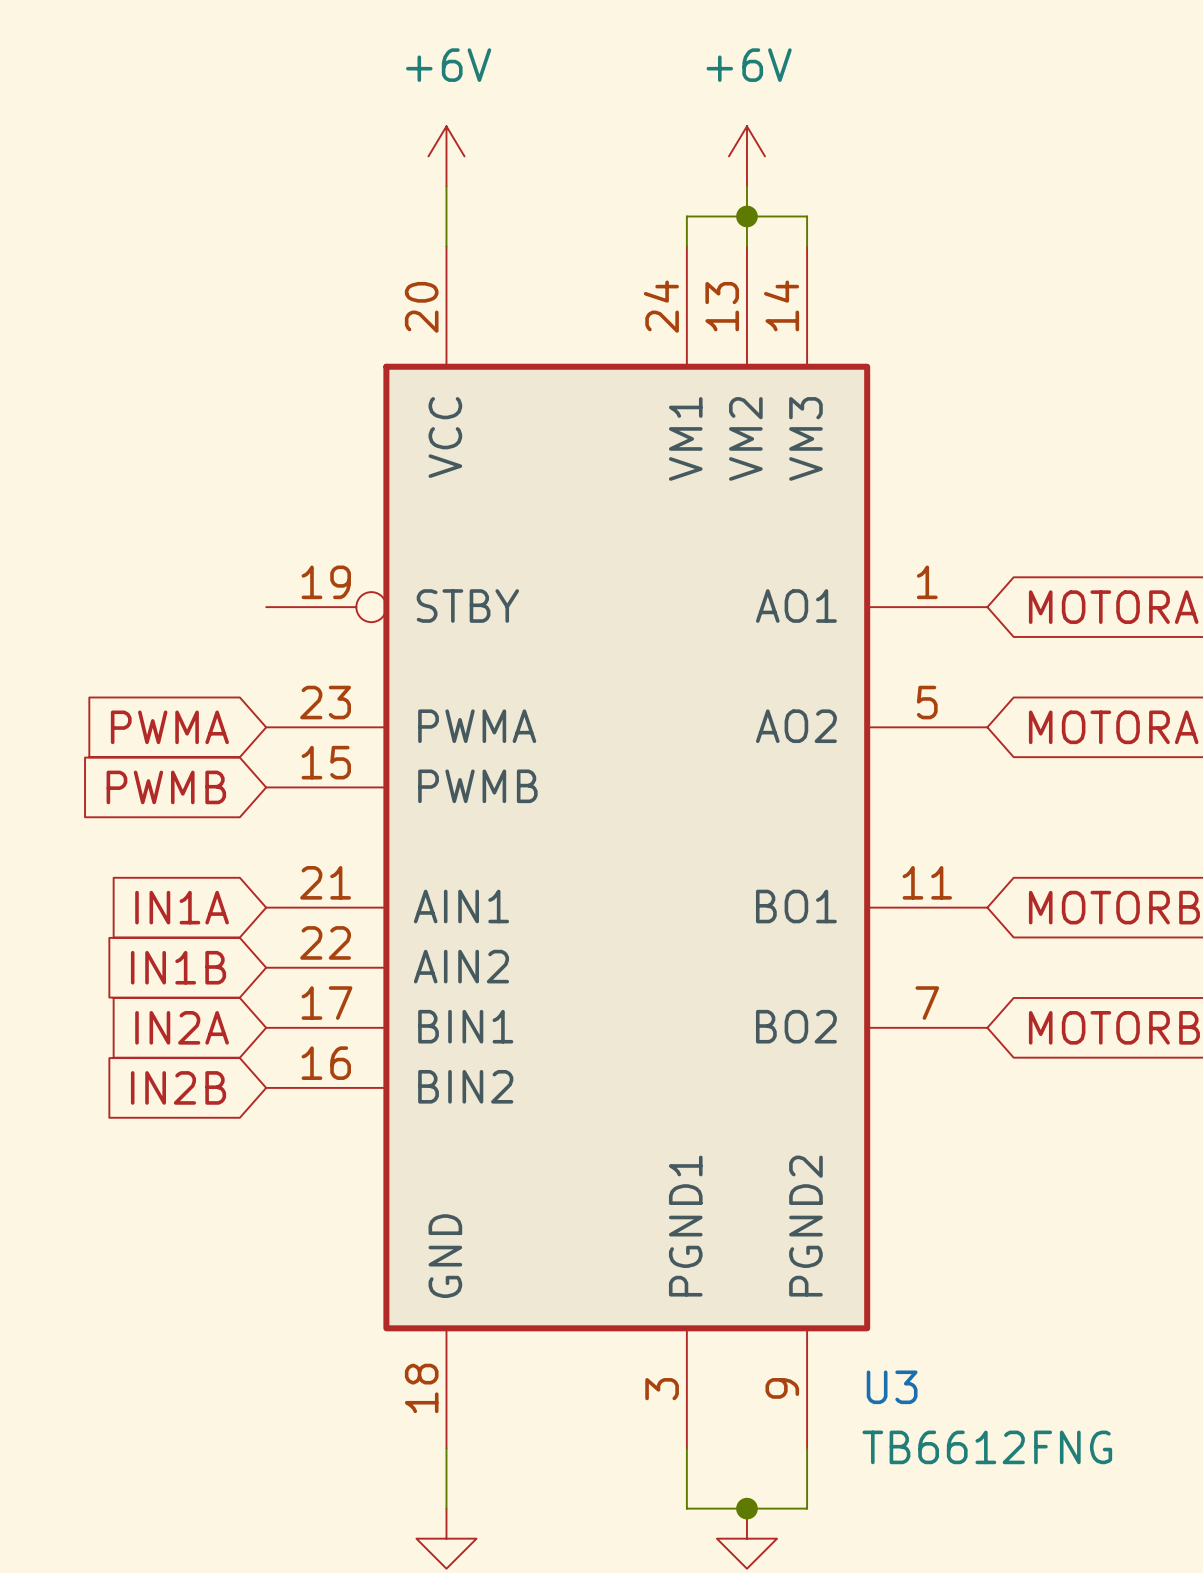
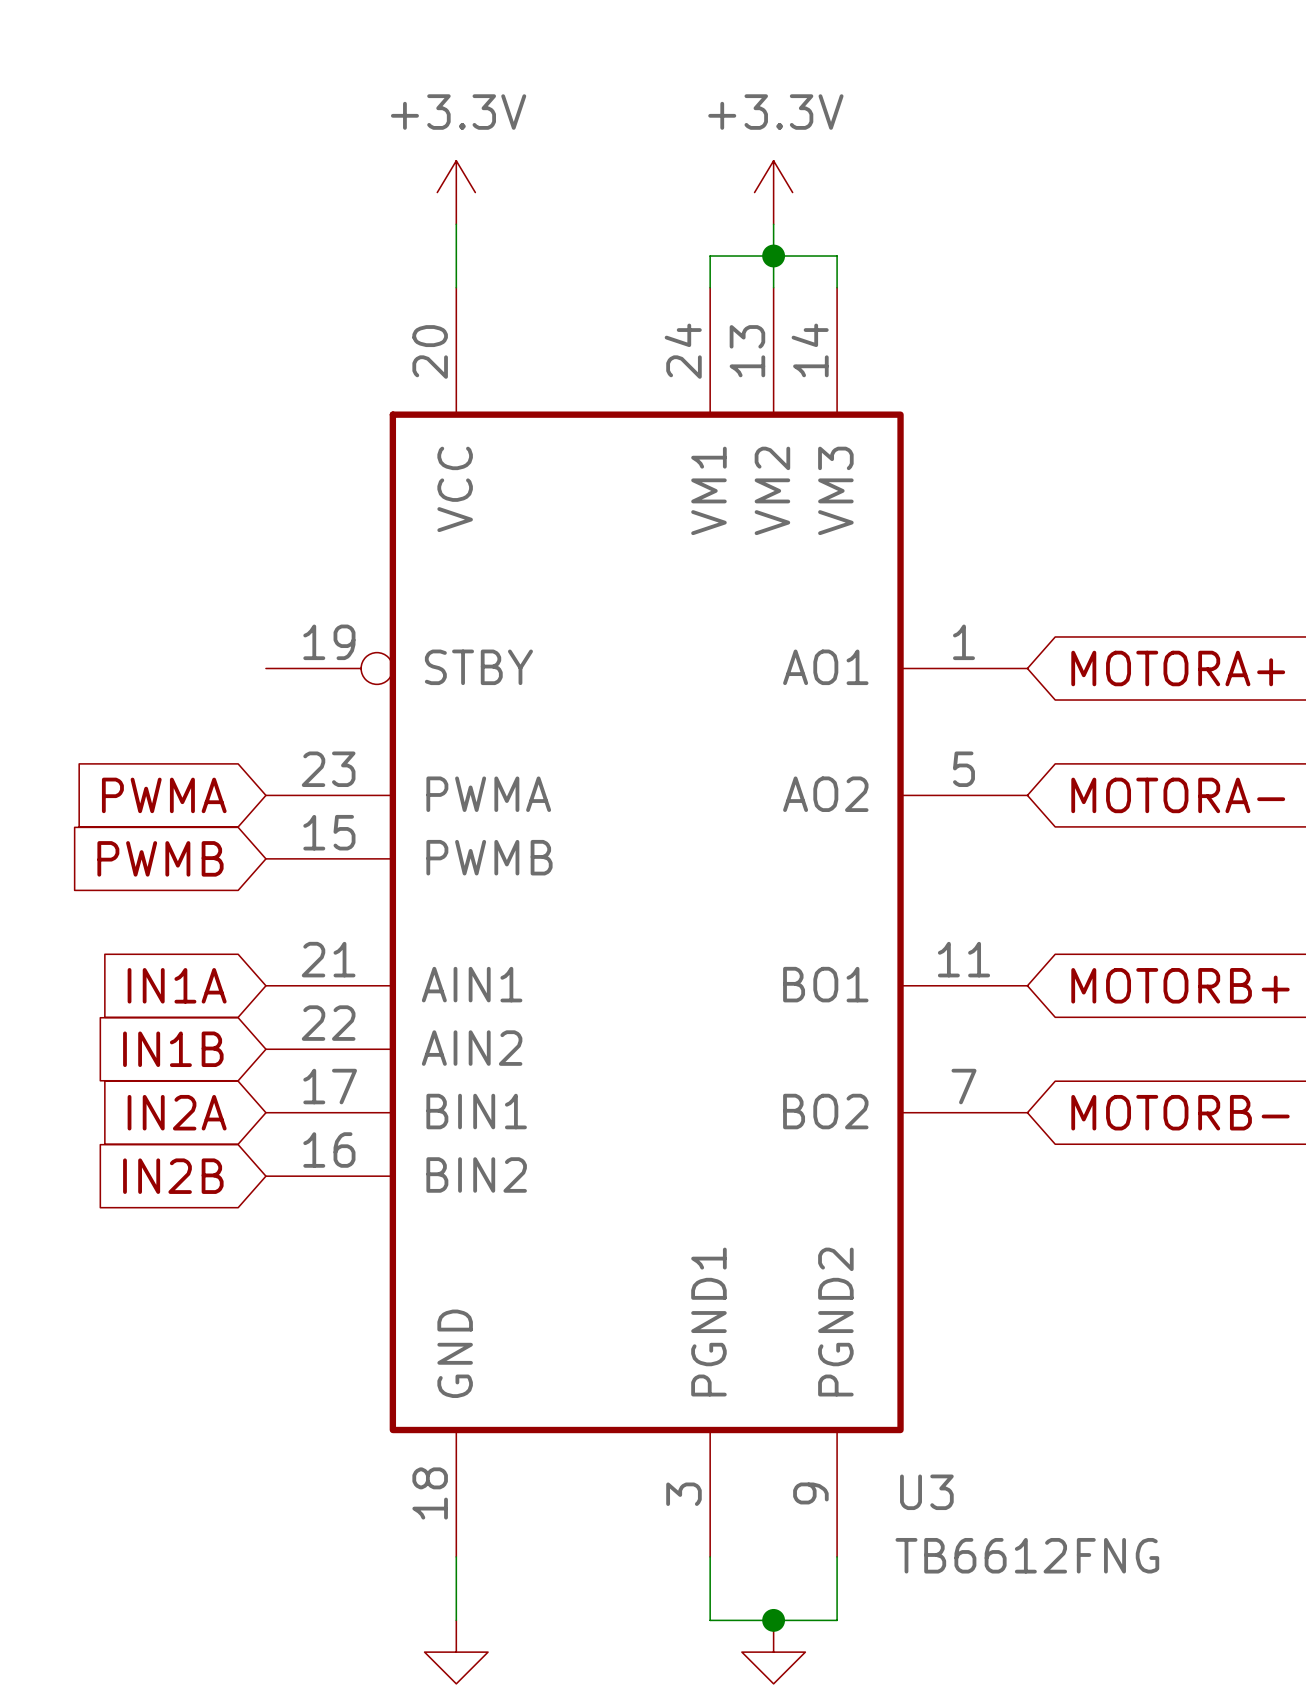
power symbol: +6V (446, 156) -> +3.3V (456, 192)
power symbol: +6V (746, 156) -> +3.3V (773, 192)

